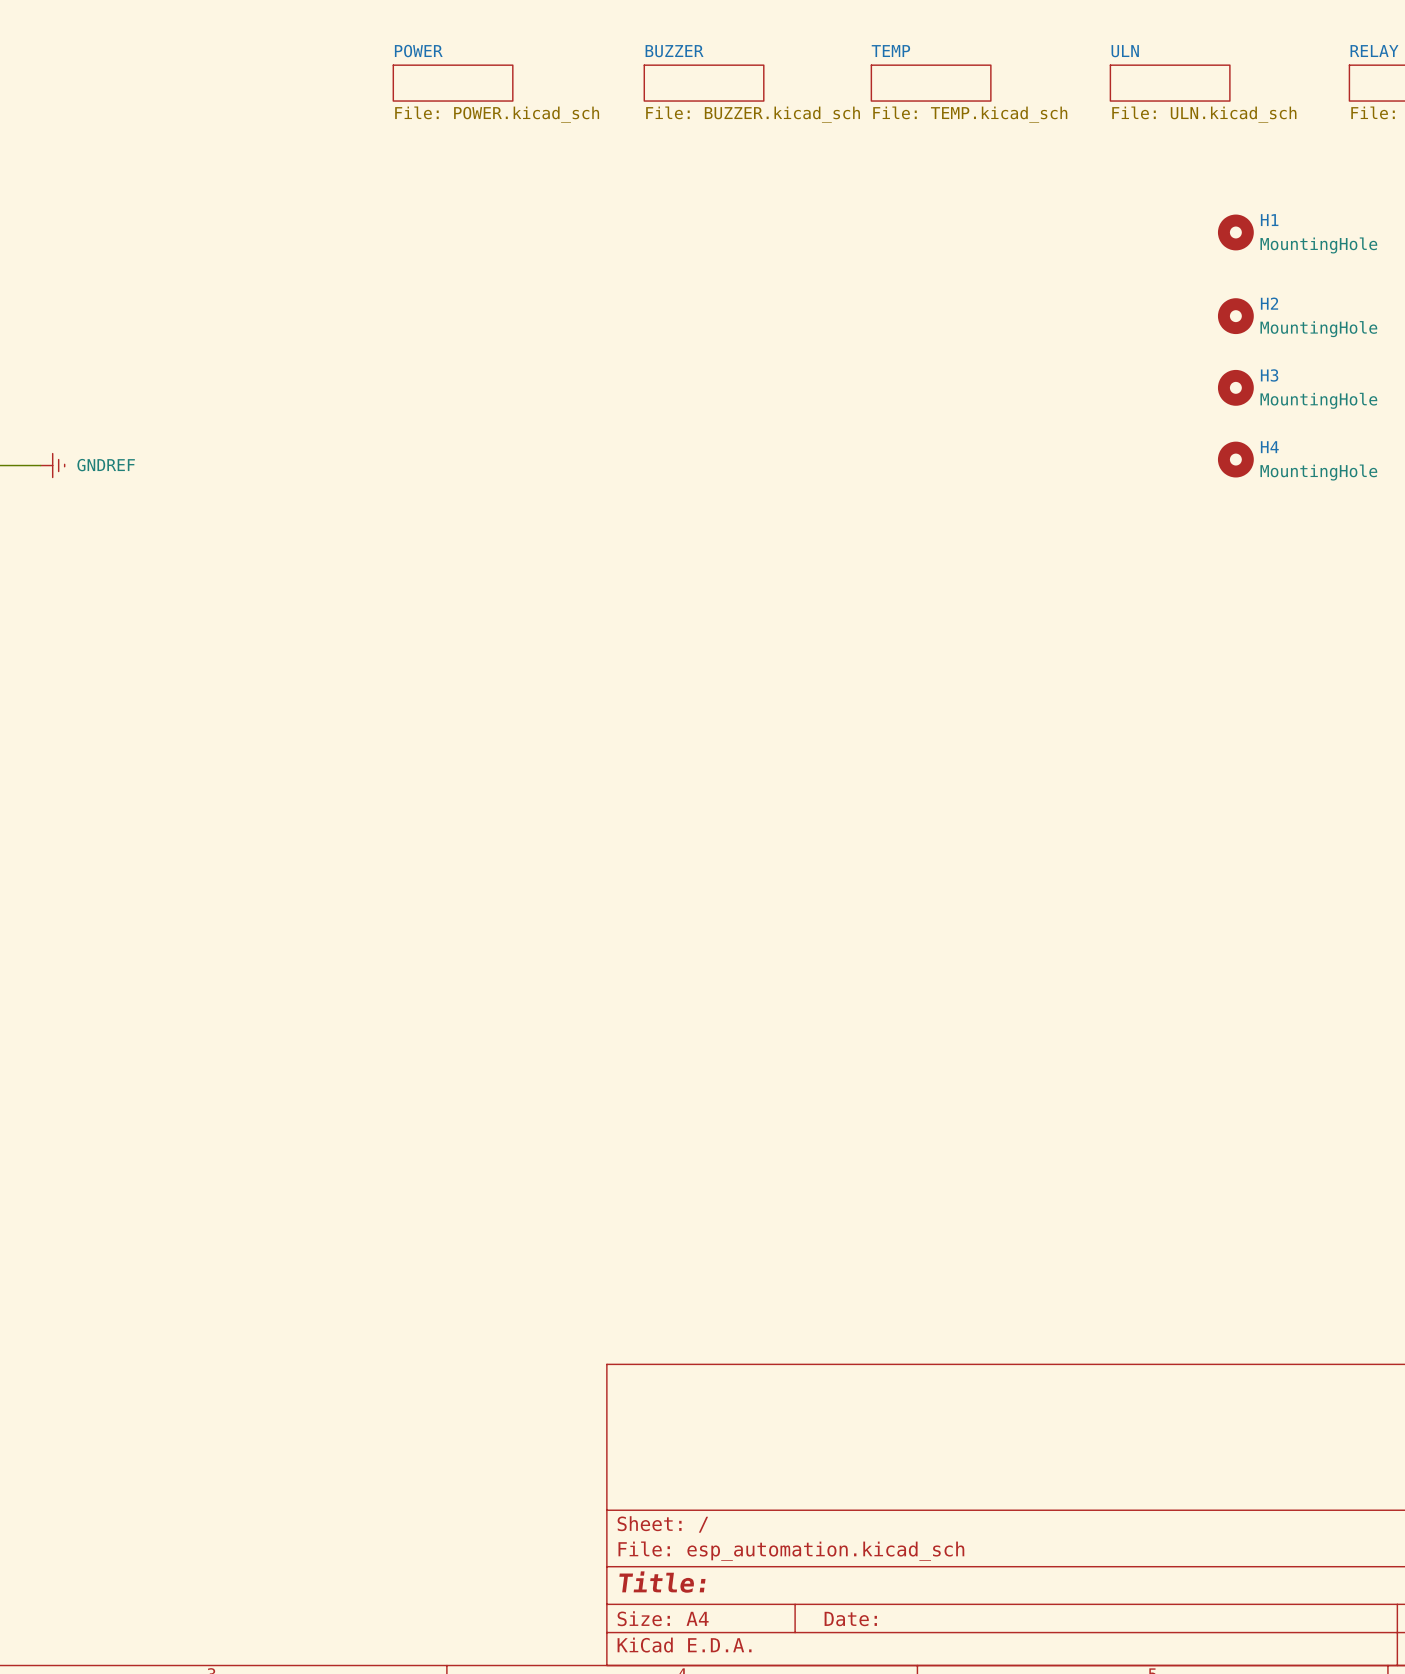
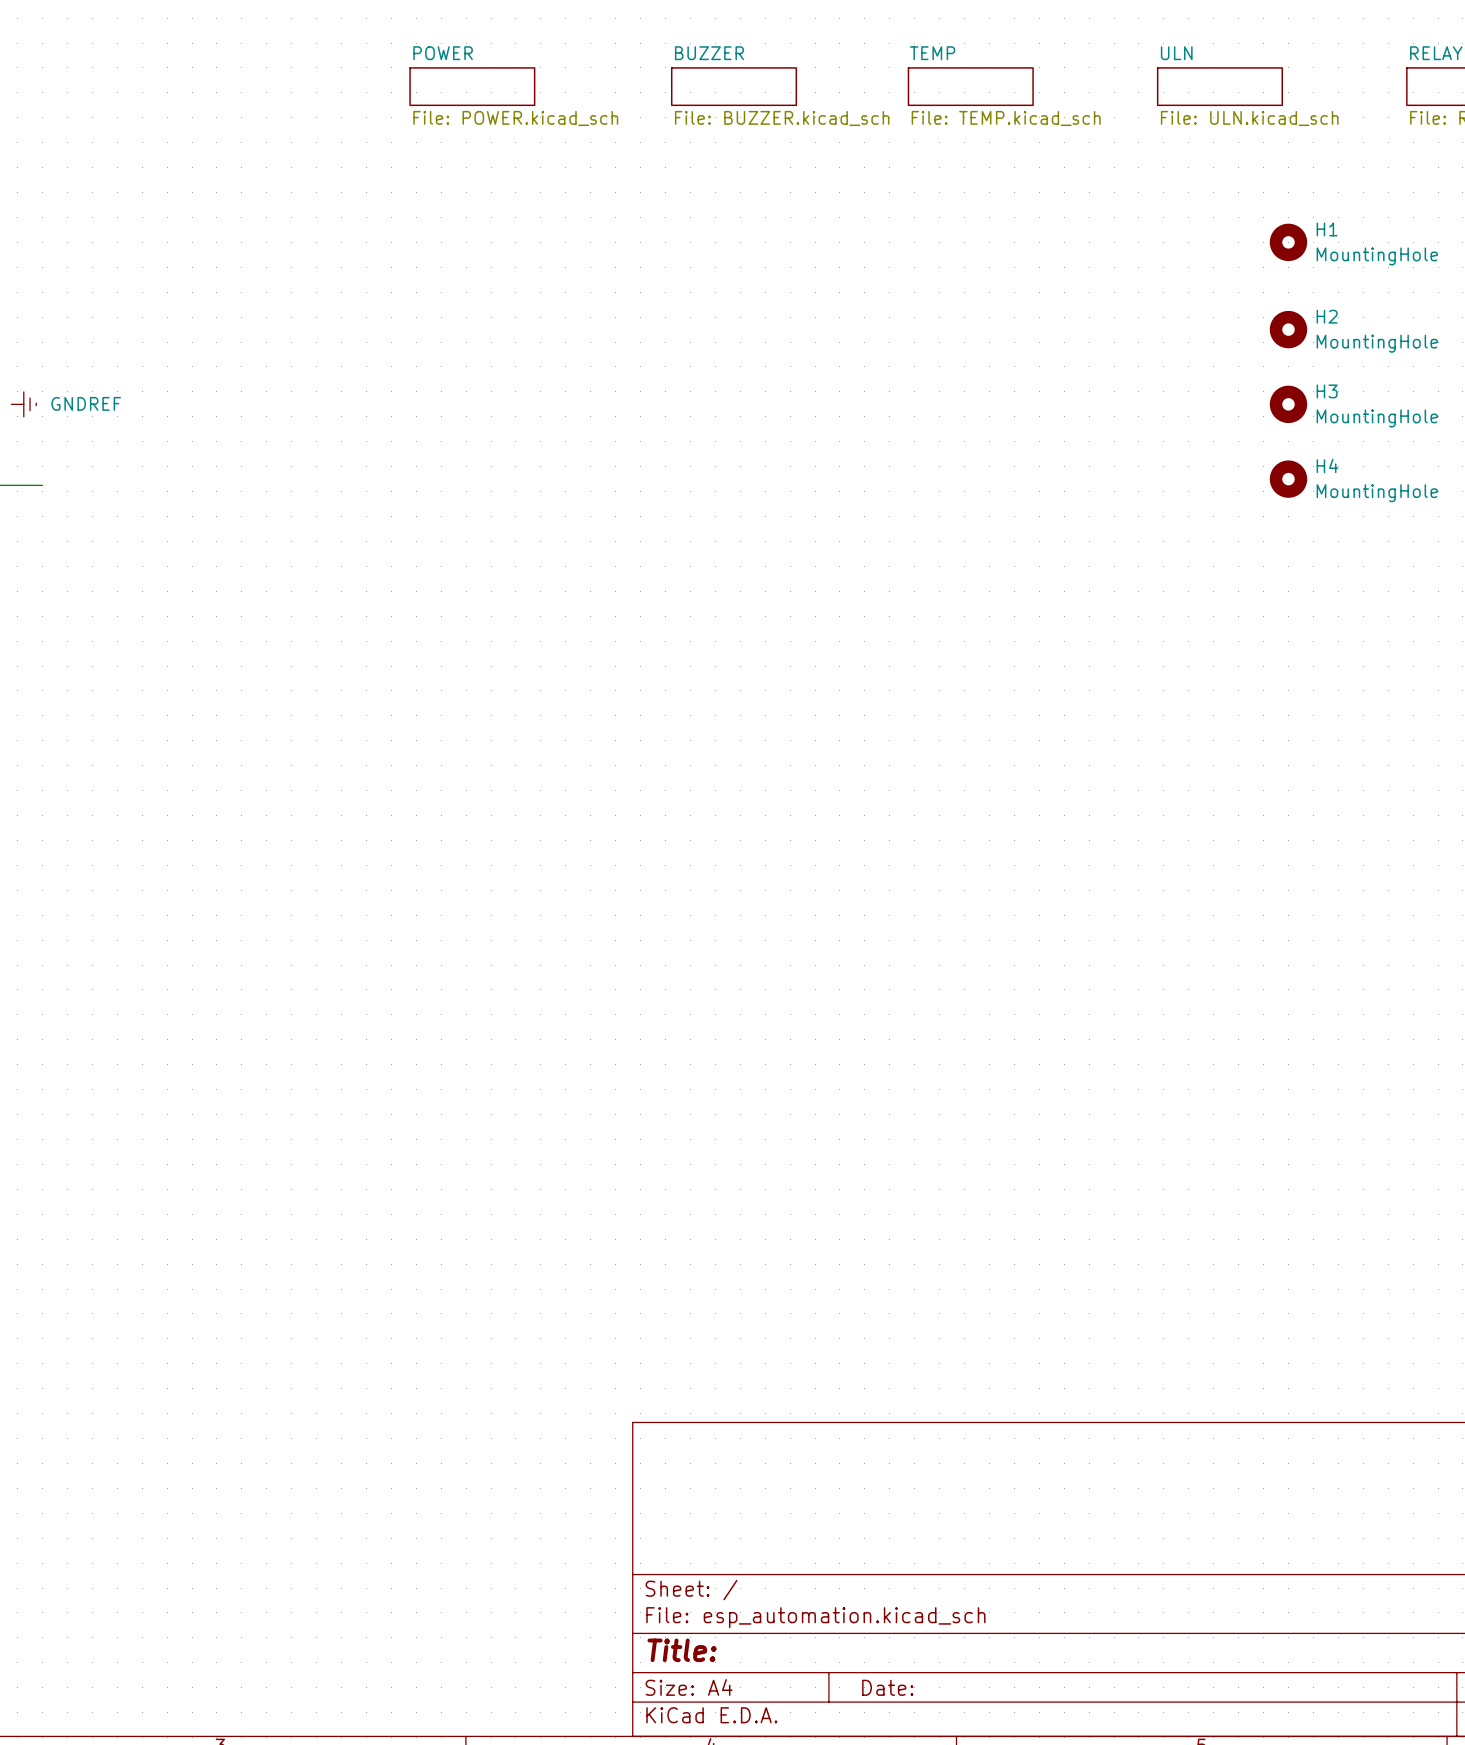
power symbol position: GNDREF (52, 465) -> GNDREF (23, 404)

